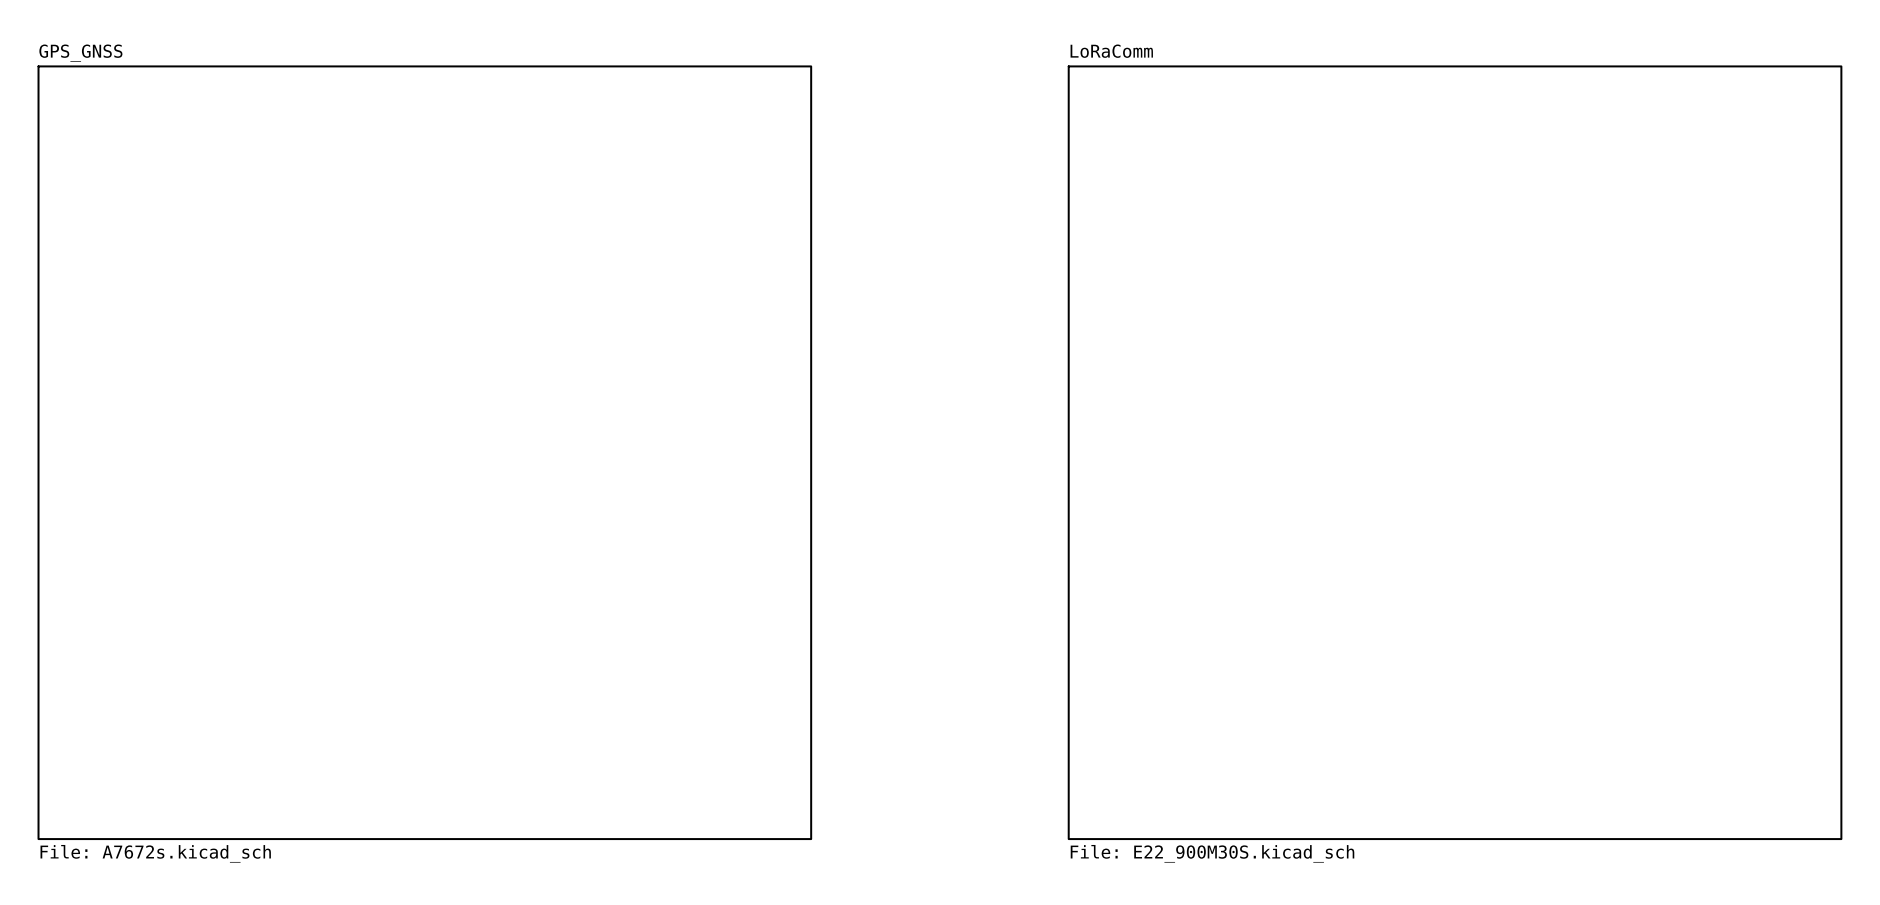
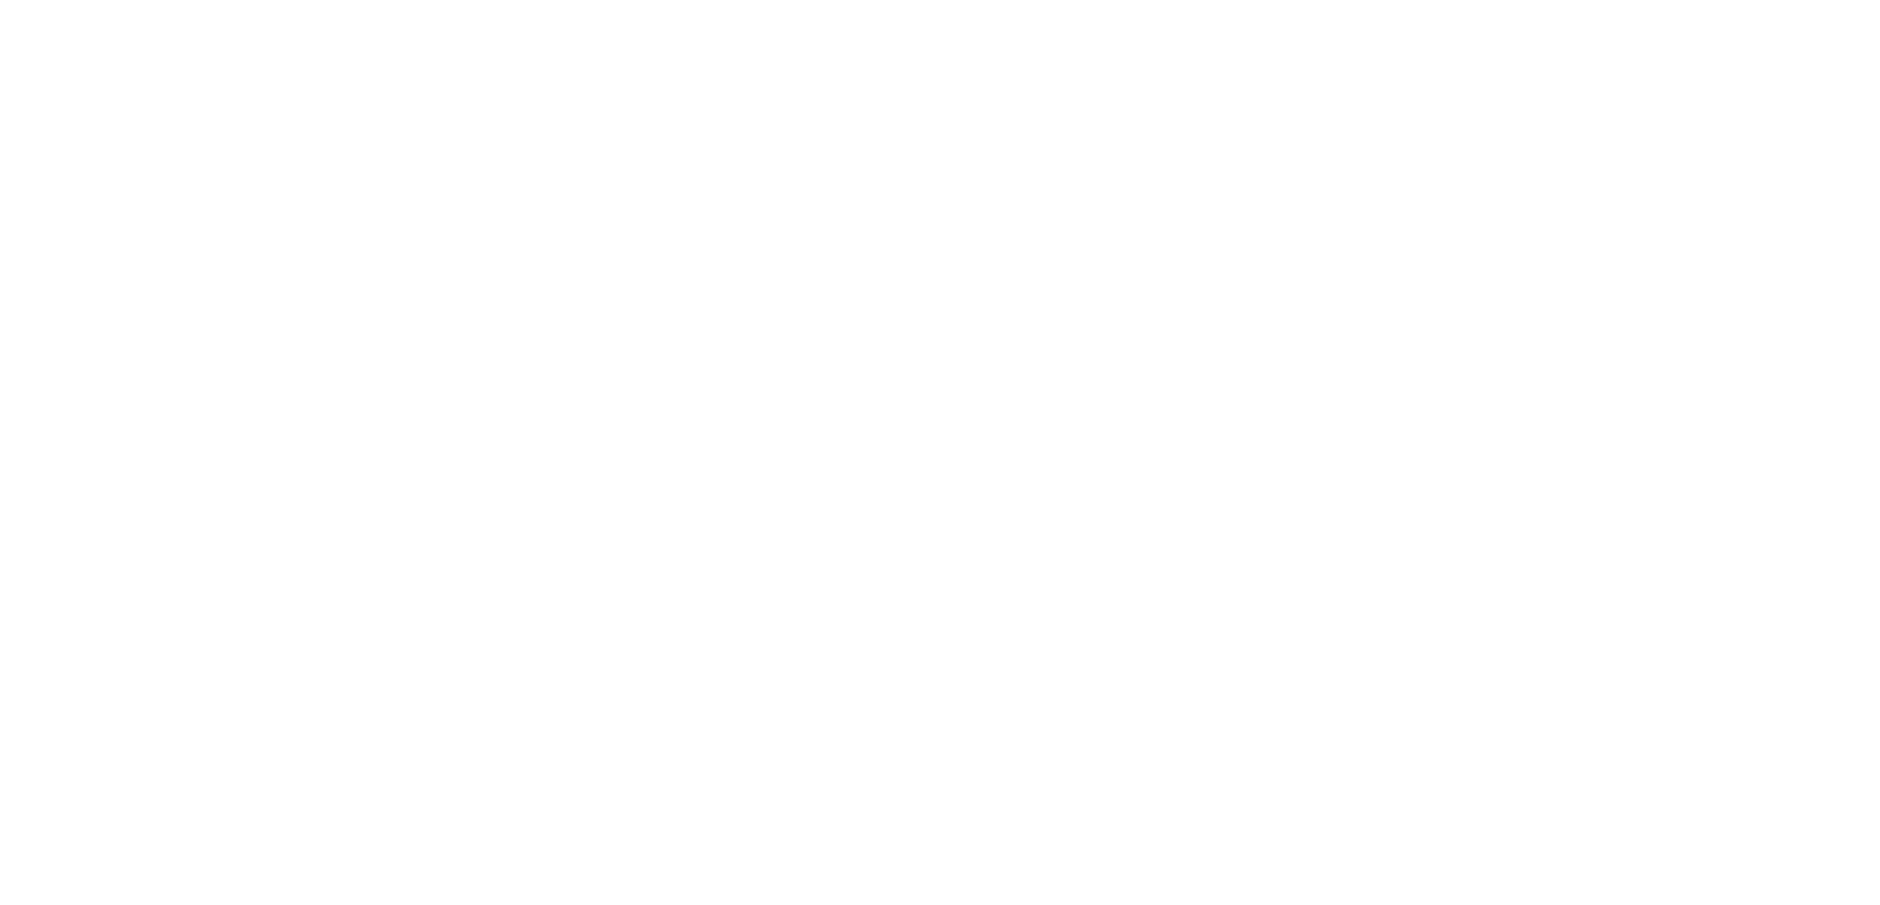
sheet GPS_GNSS: File: A7672s.kicad_sch (424, 452) -> none
sheet LoRaComm: File: E22_900M30S.kicad_sch (1455, 452) -> none

